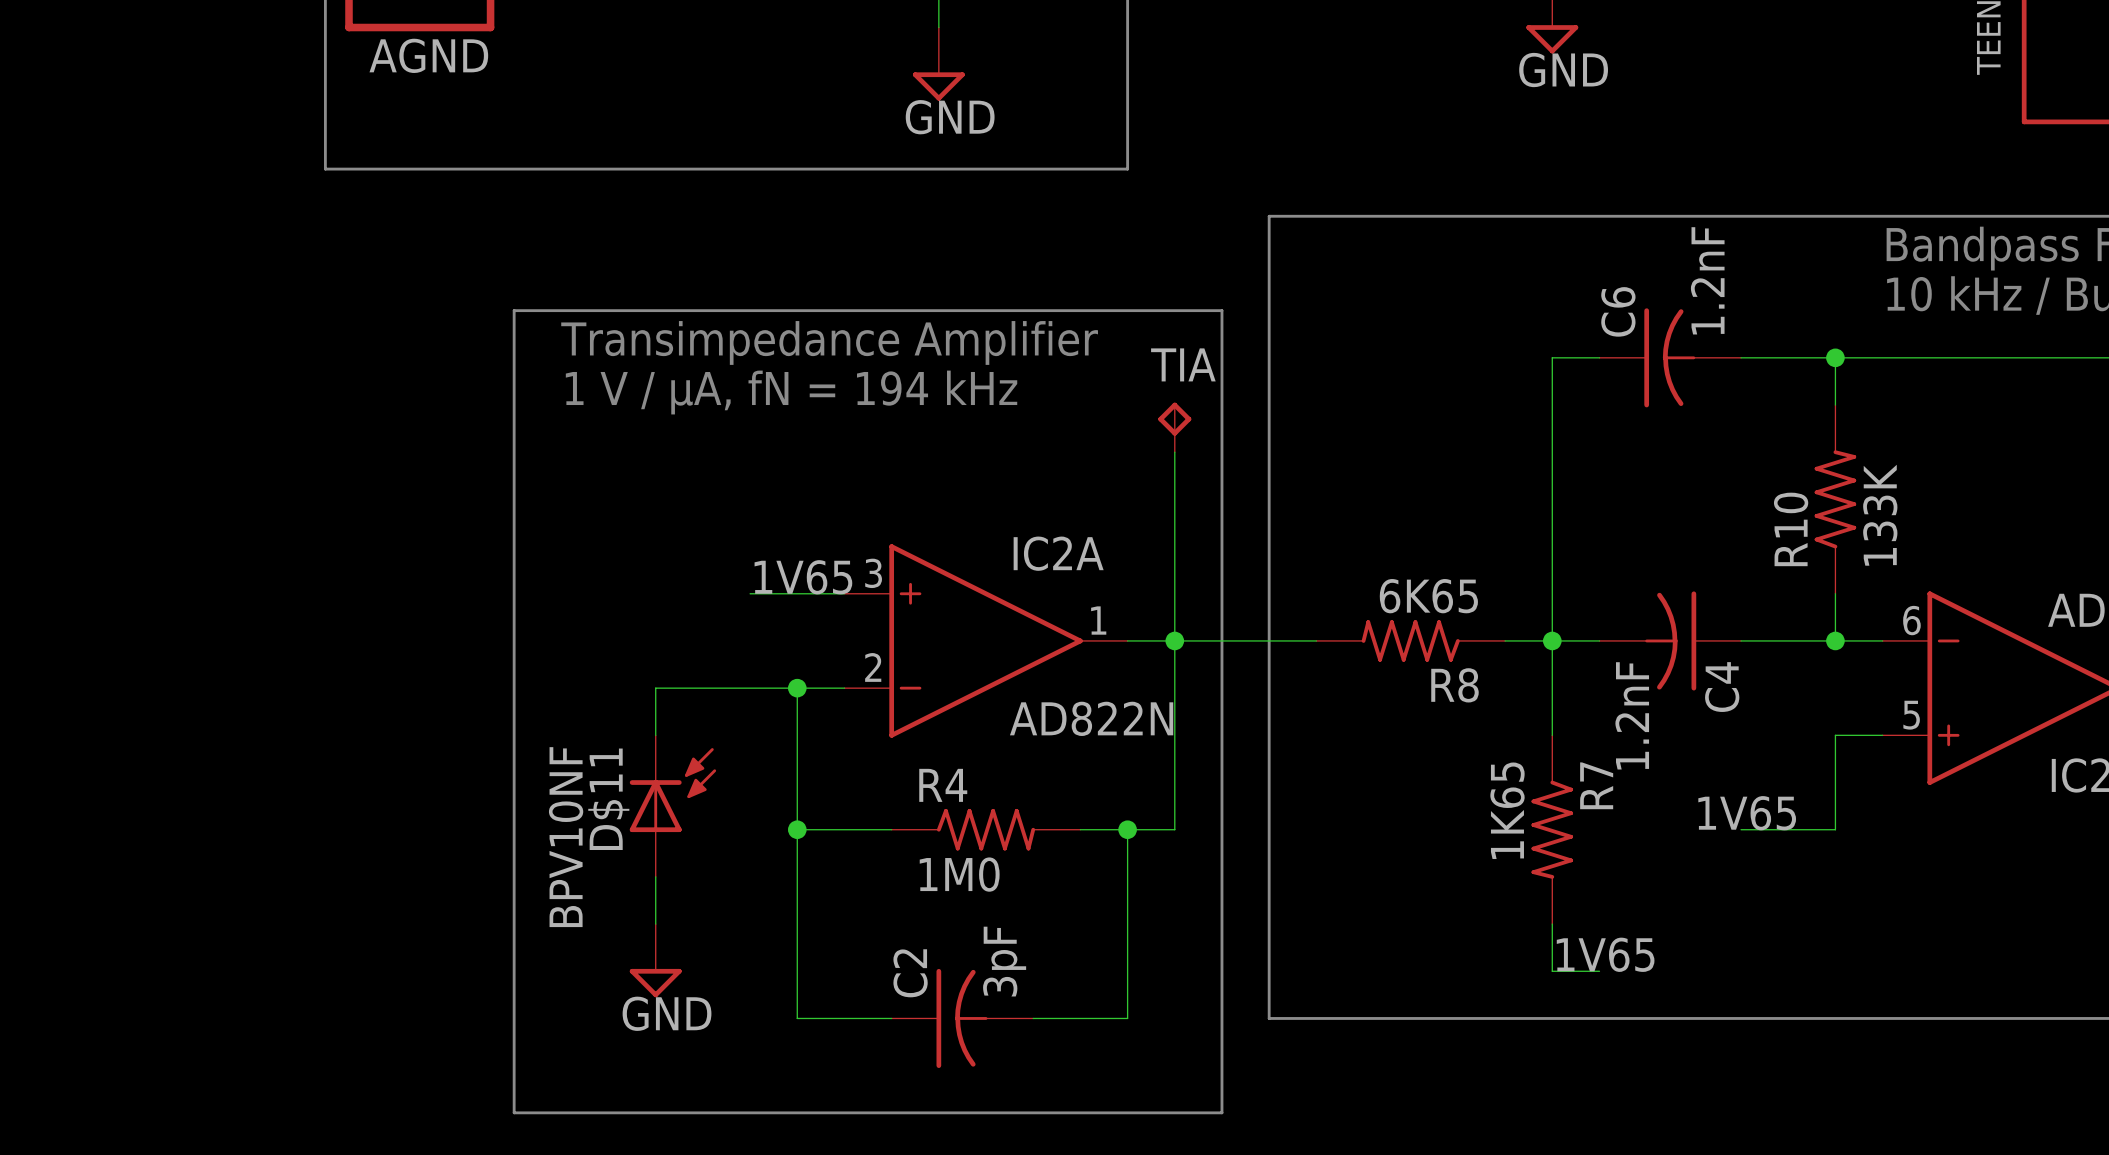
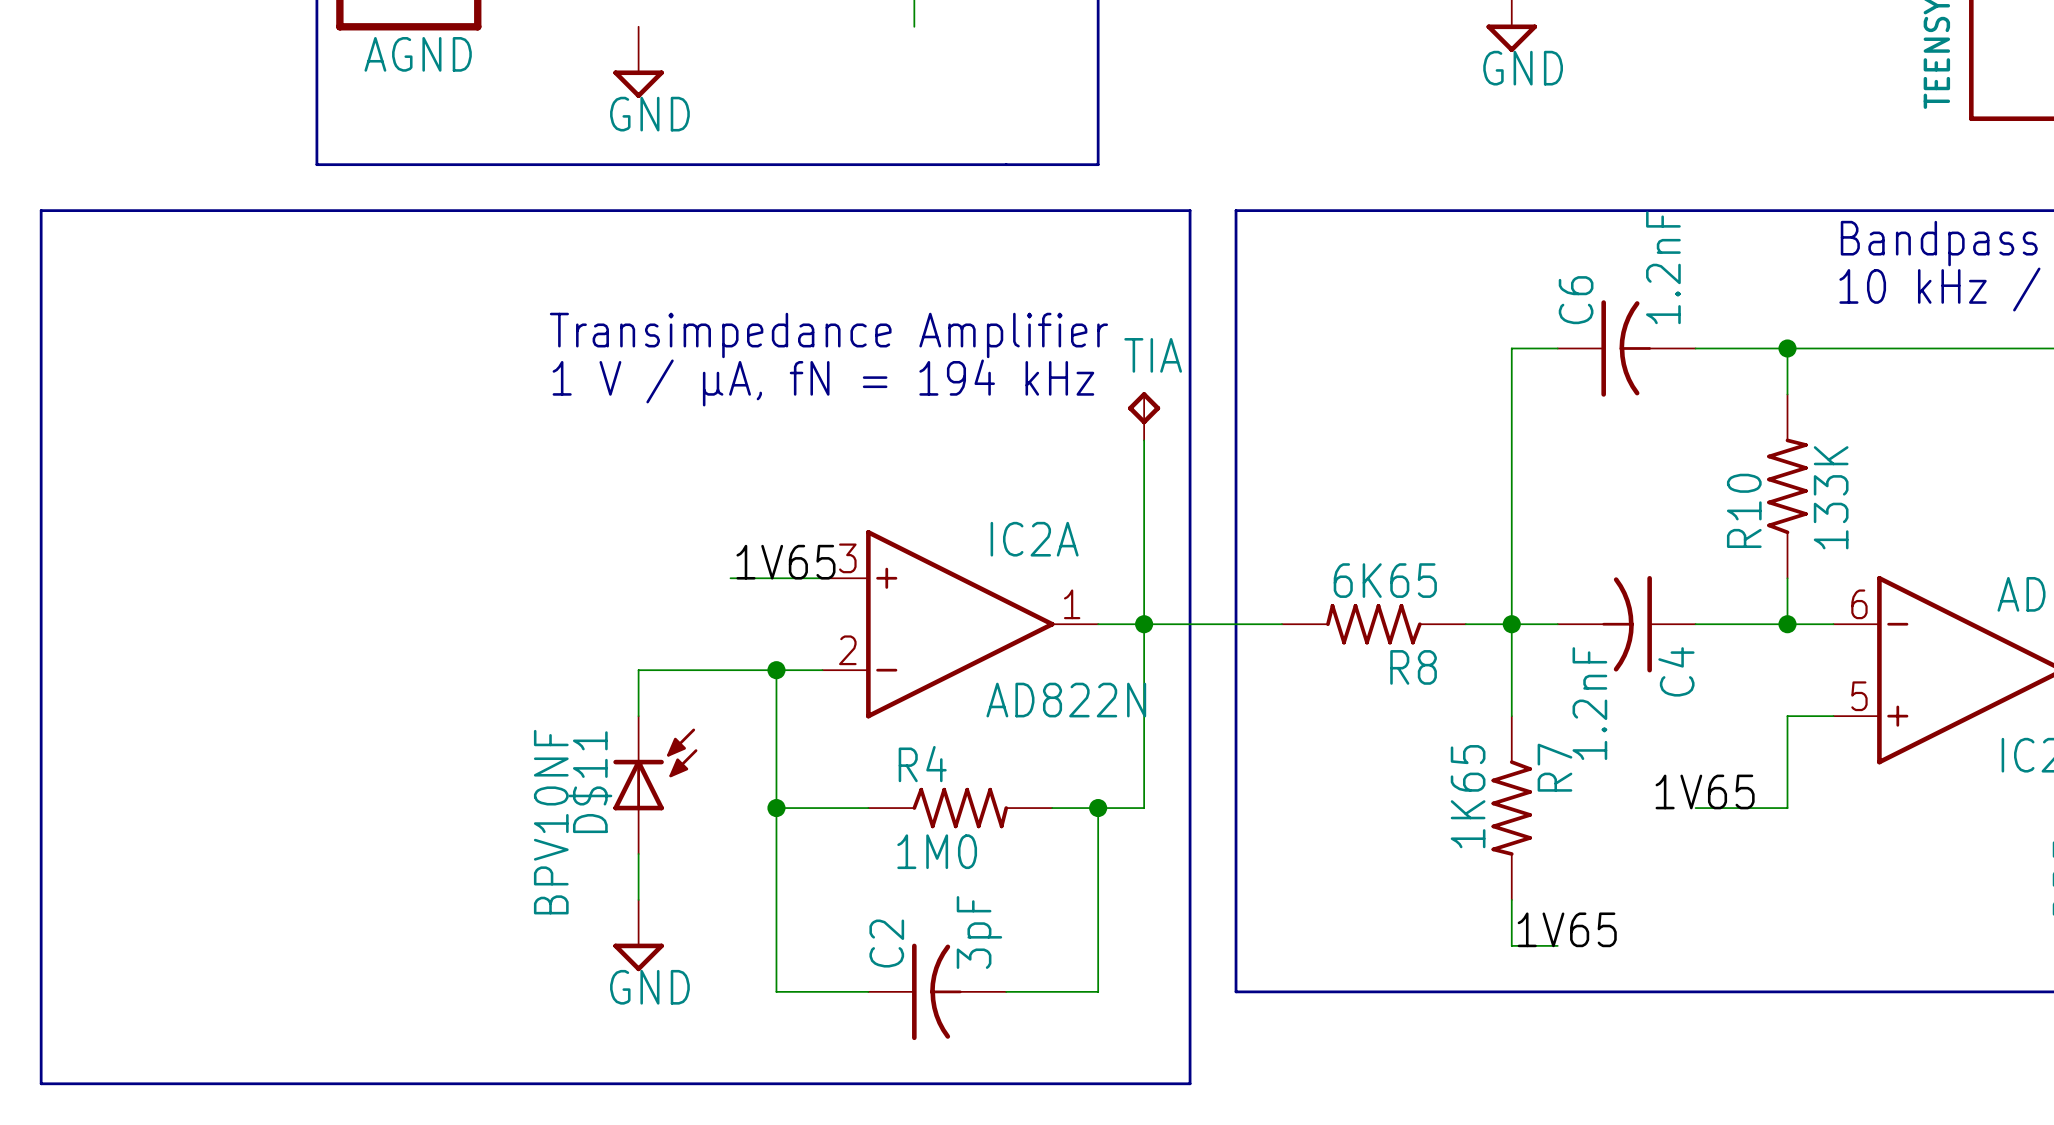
power symbol position: GND (938, 64) -> GND (638, 62)
line: (1221, 310) (514, 310) (514, 1112) -> (1190, 302) (1190, 210) (41, 210) (41, 1083) (500, 1083)

